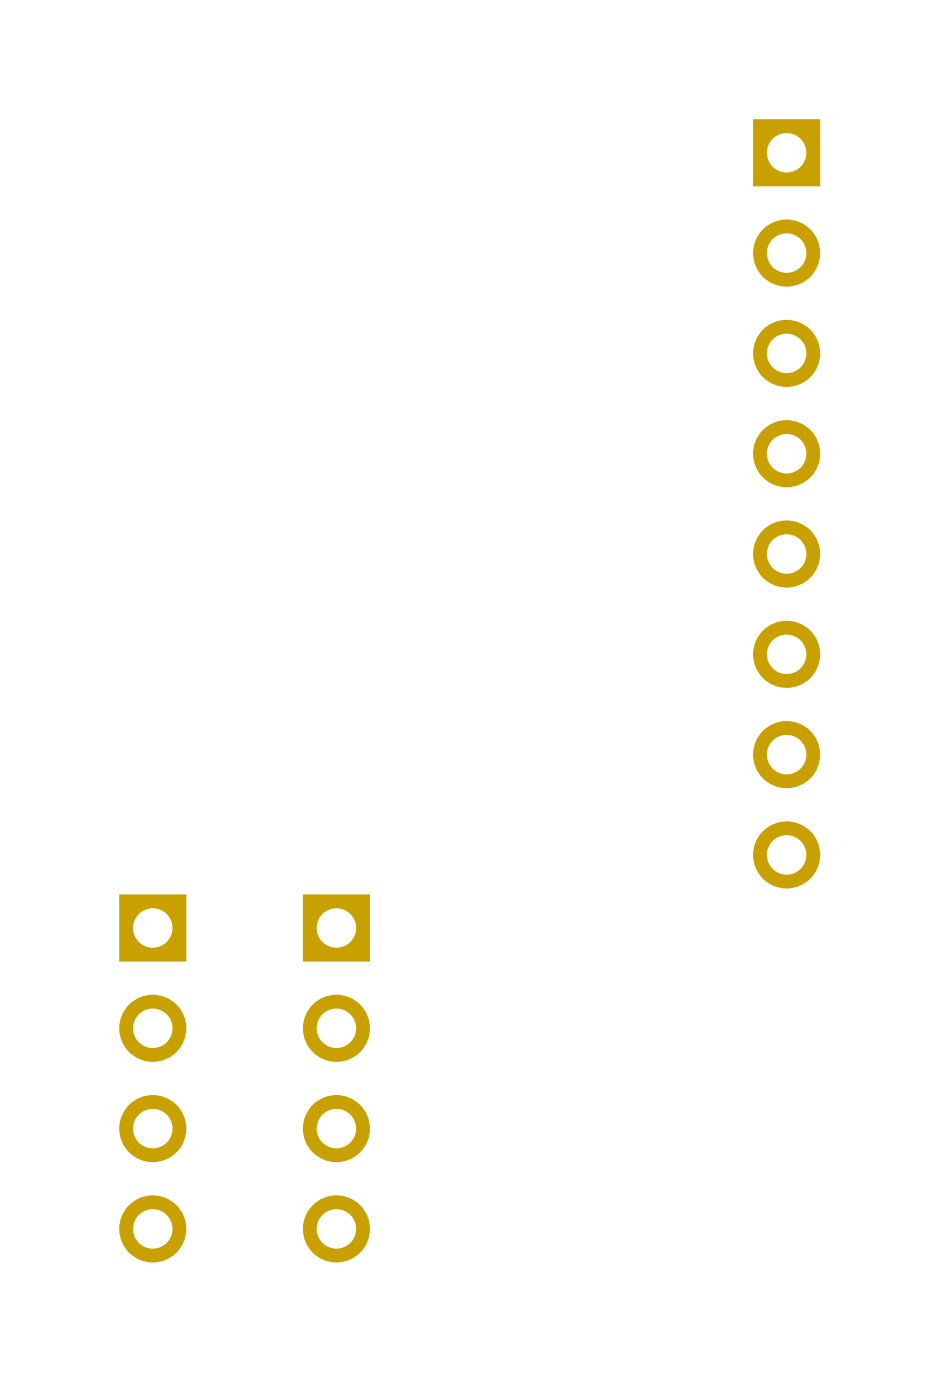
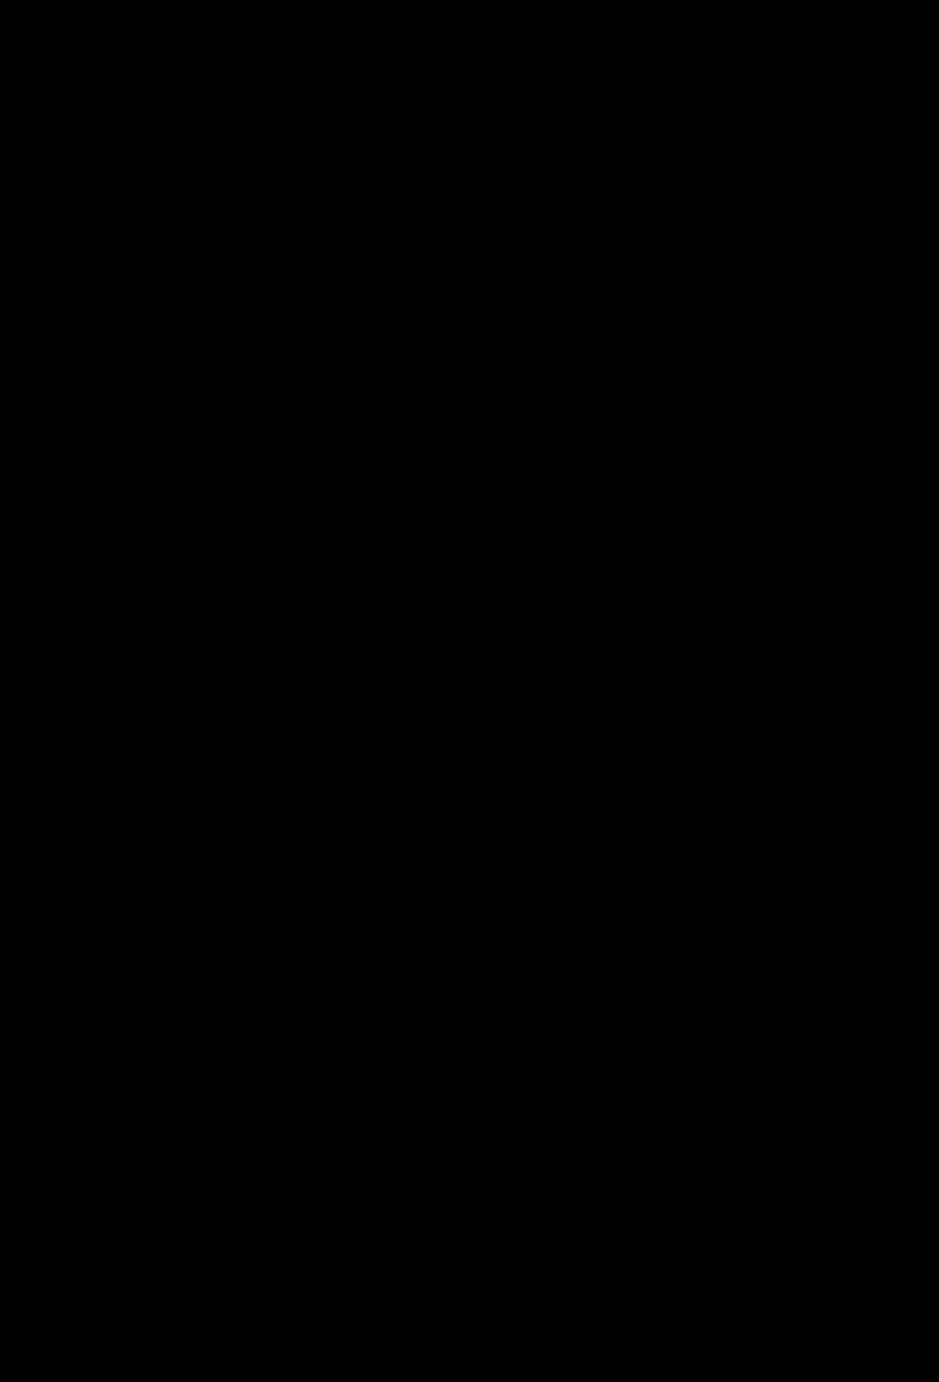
part: (786, 503) -> none
part: (152, 1078) -> none
part: (336, 1078) -> none

